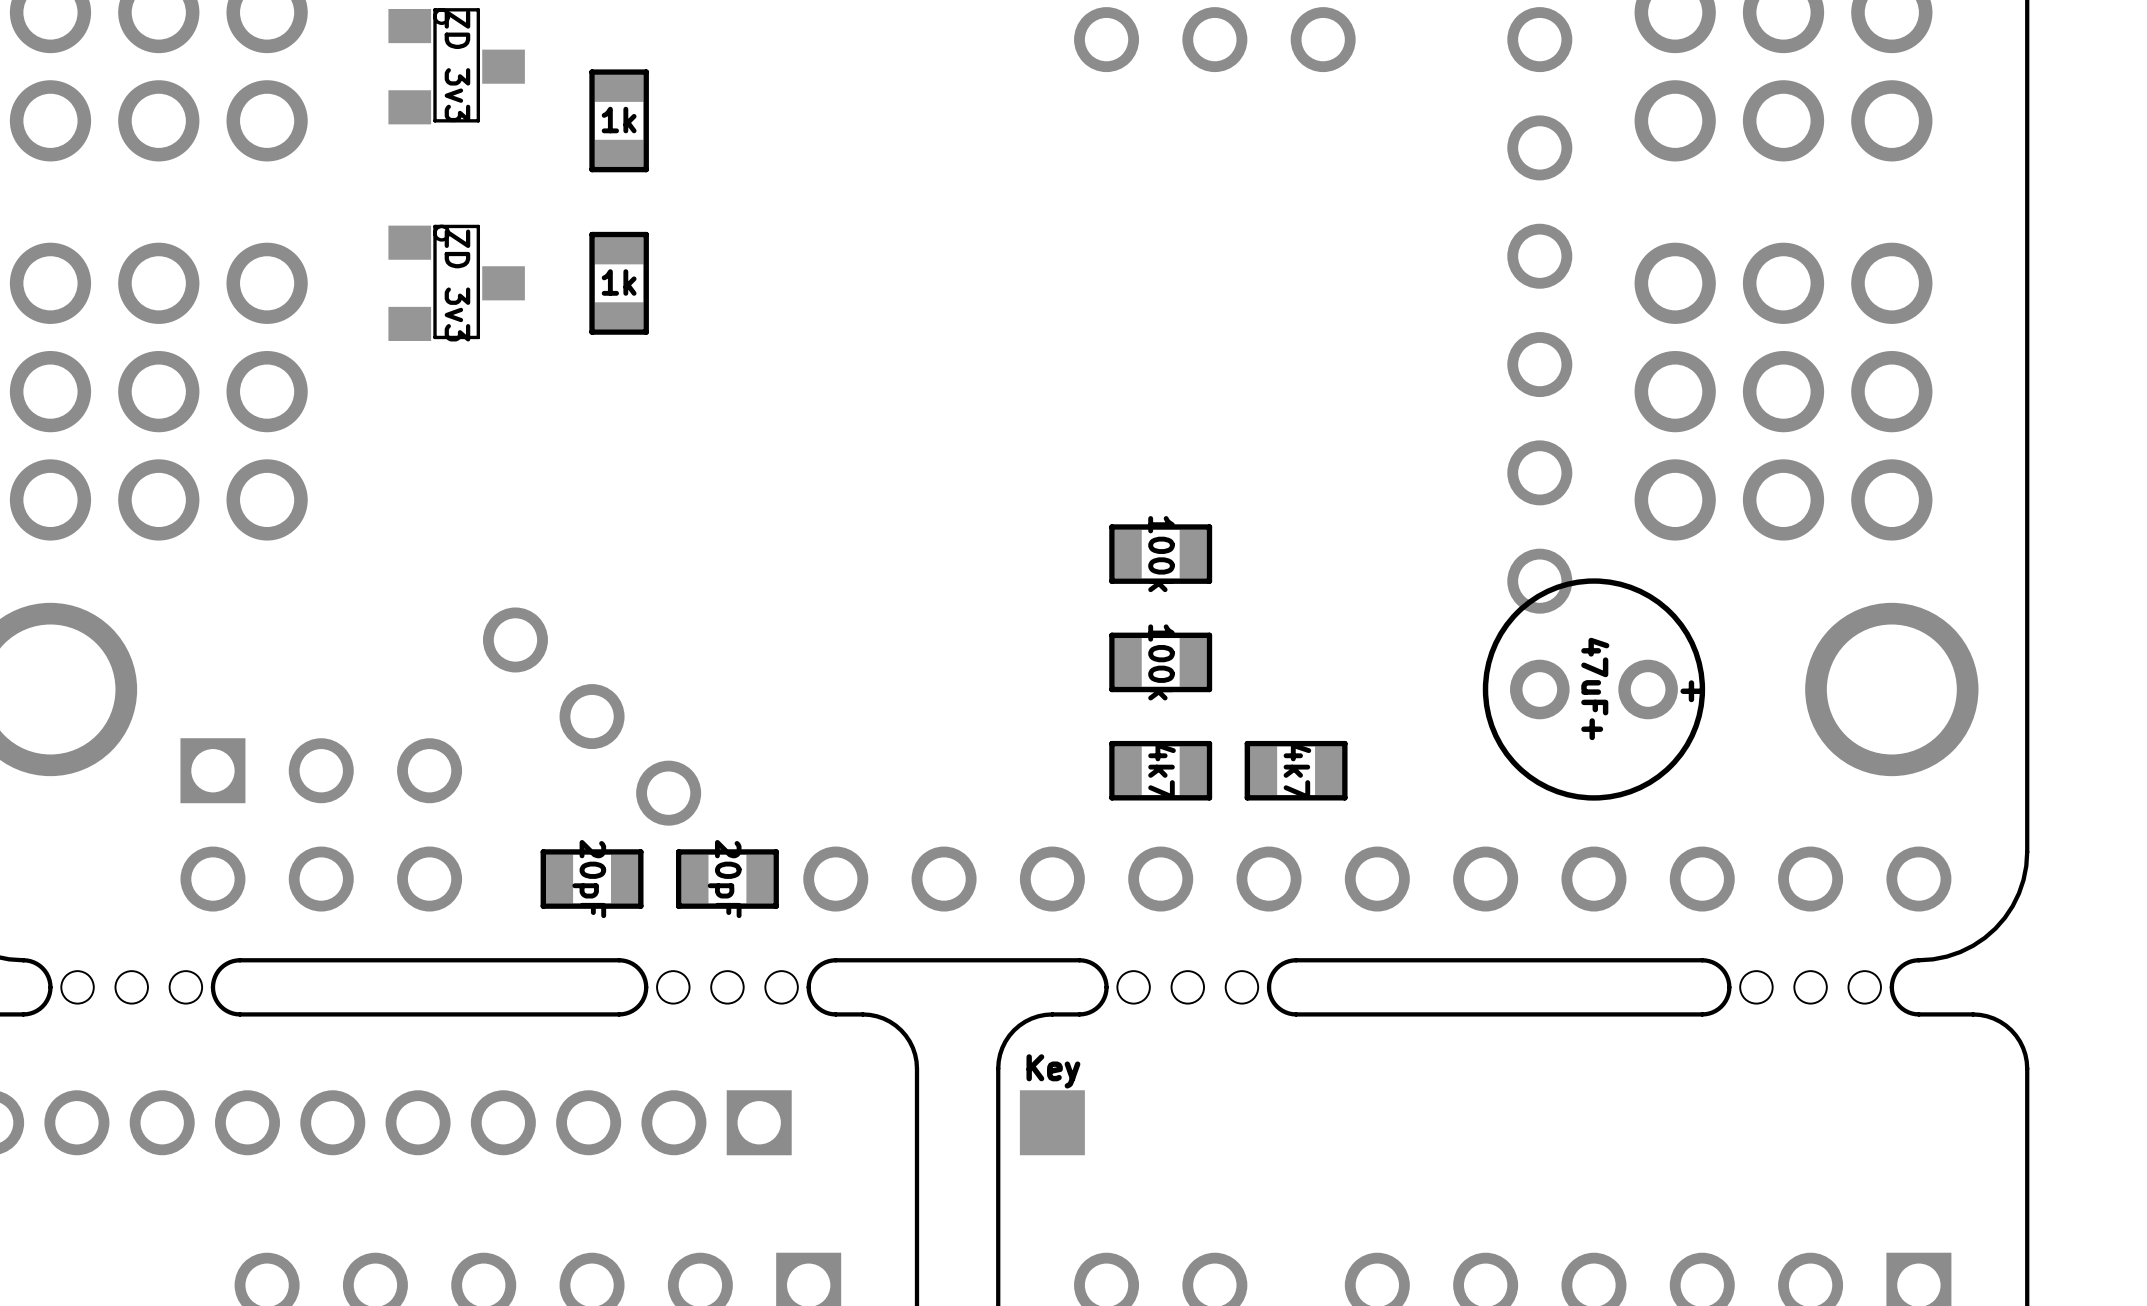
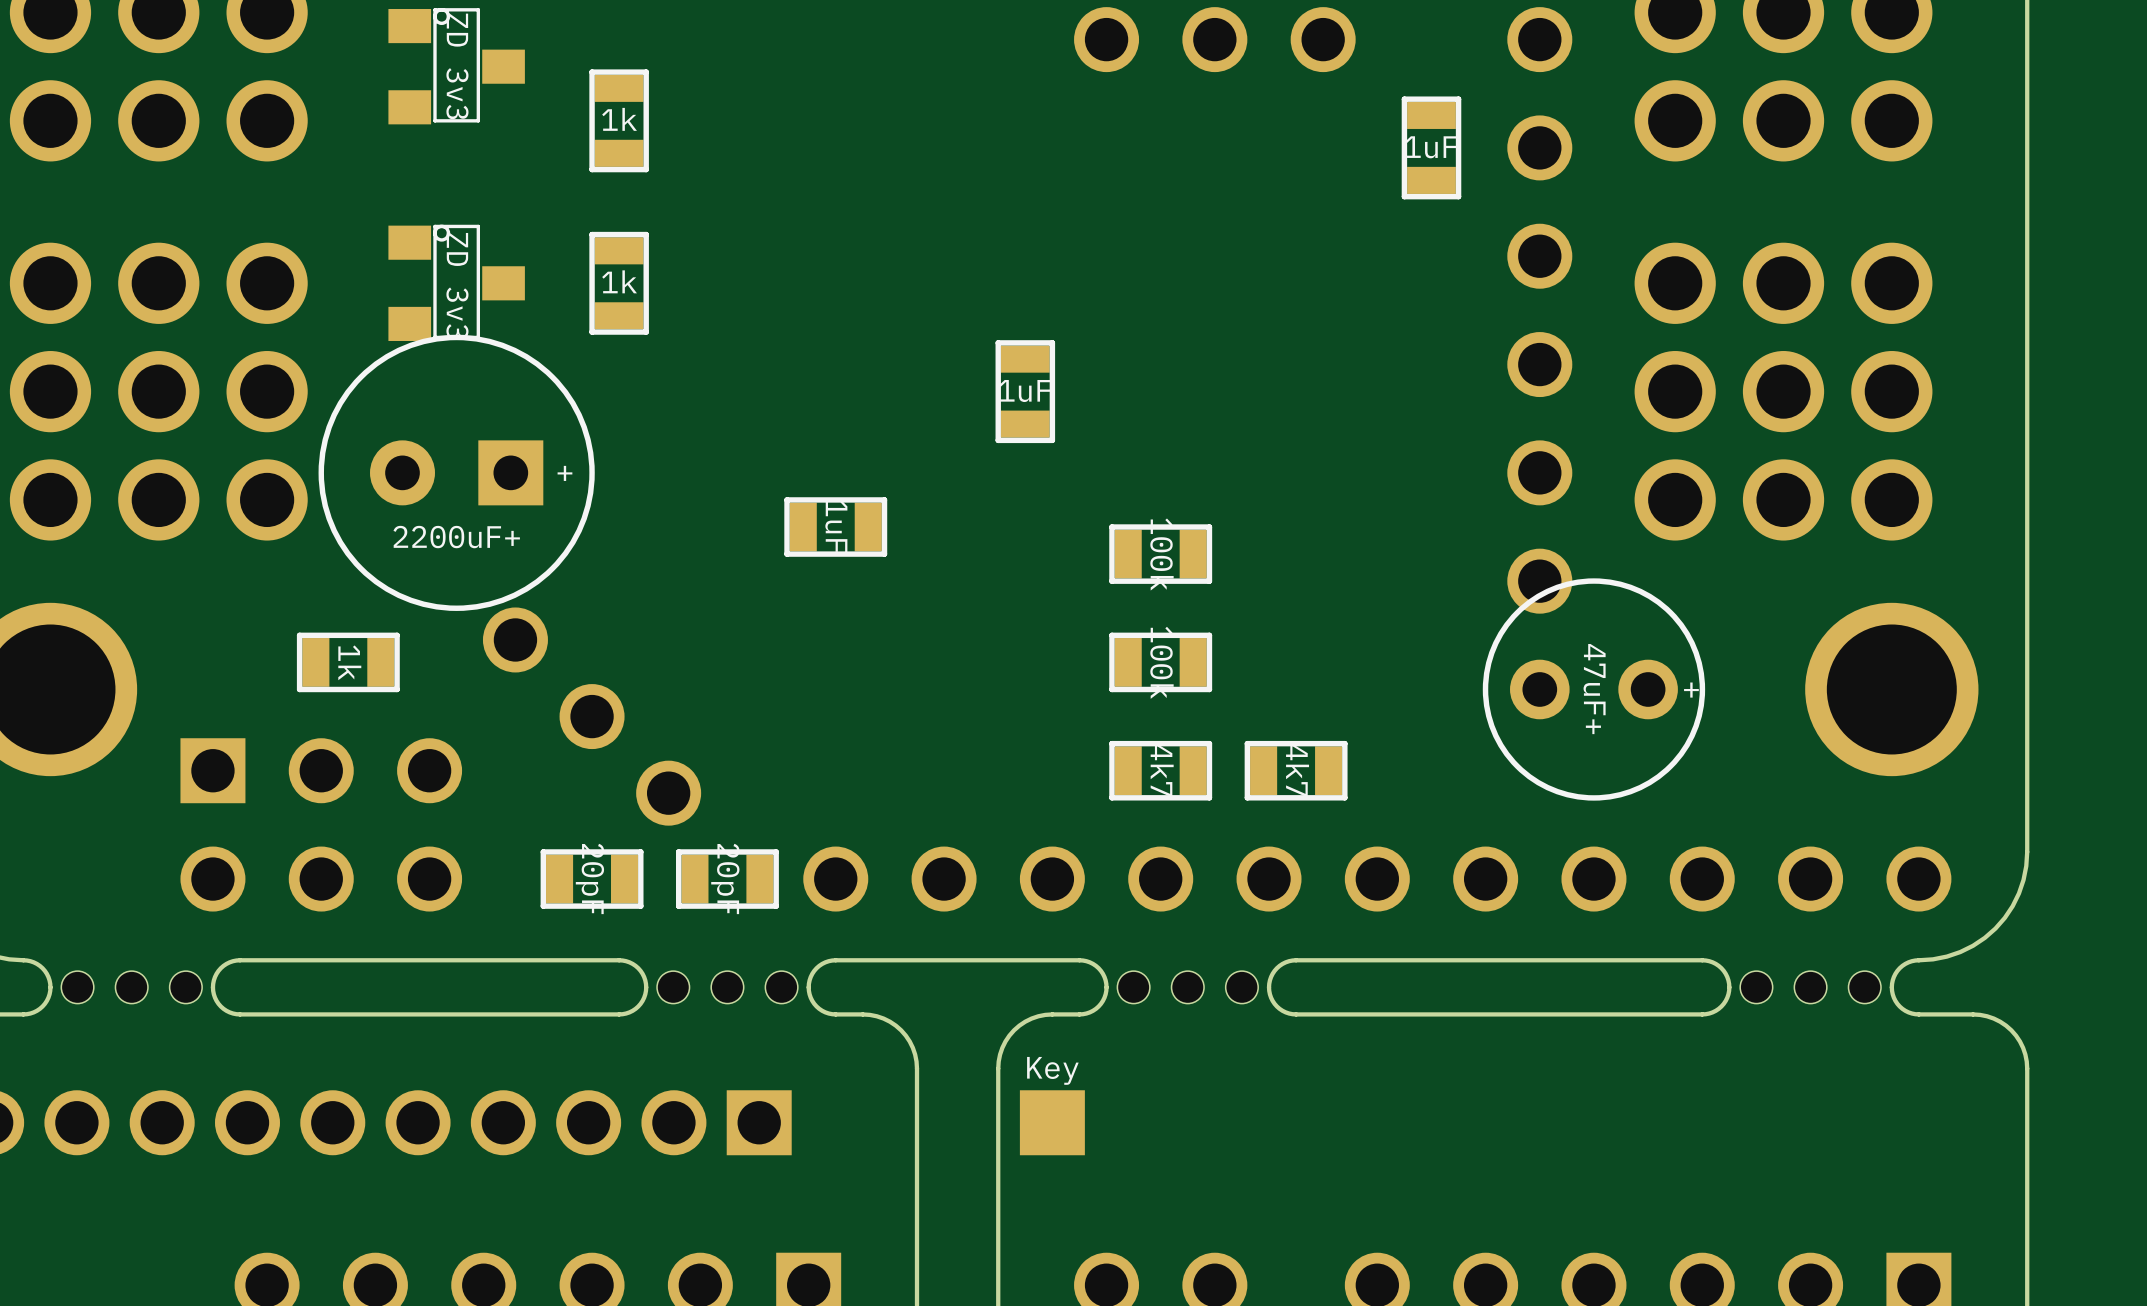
part: none -> 1uF (1431, 147)
part: none -> 1uF (1025, 391)
part: none -> 2200uF+ (456, 472)
part: none -> 1uF (835, 527)
part: none -> 1k (348, 662)

